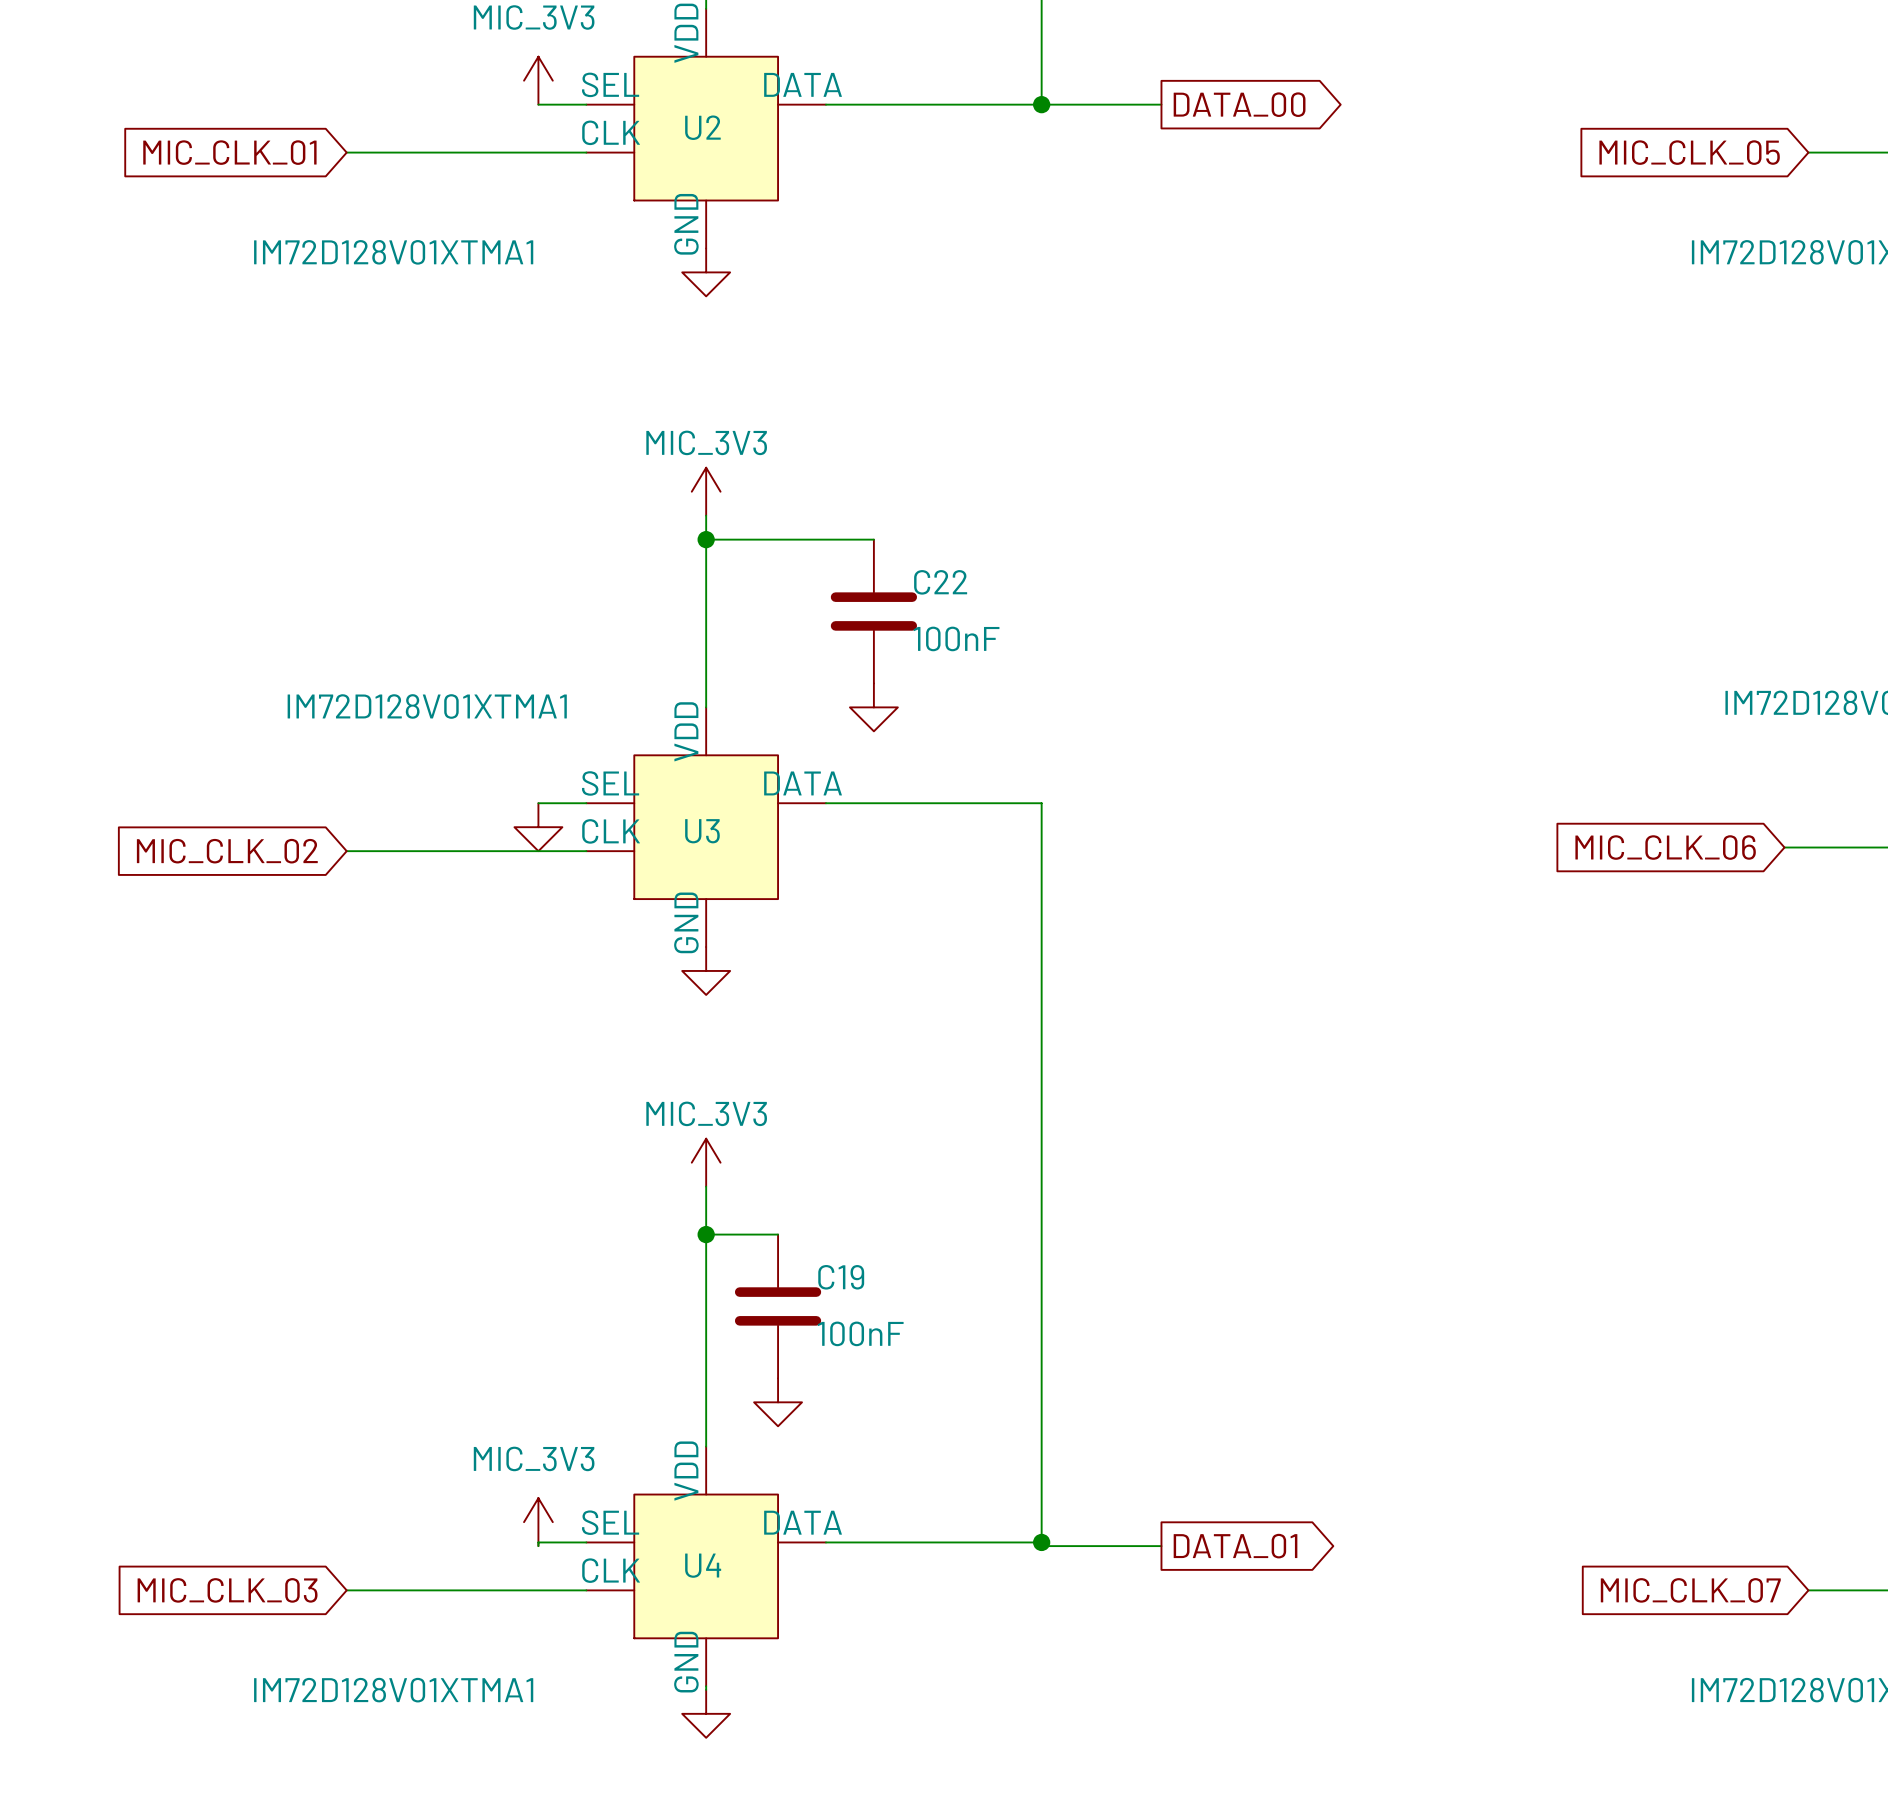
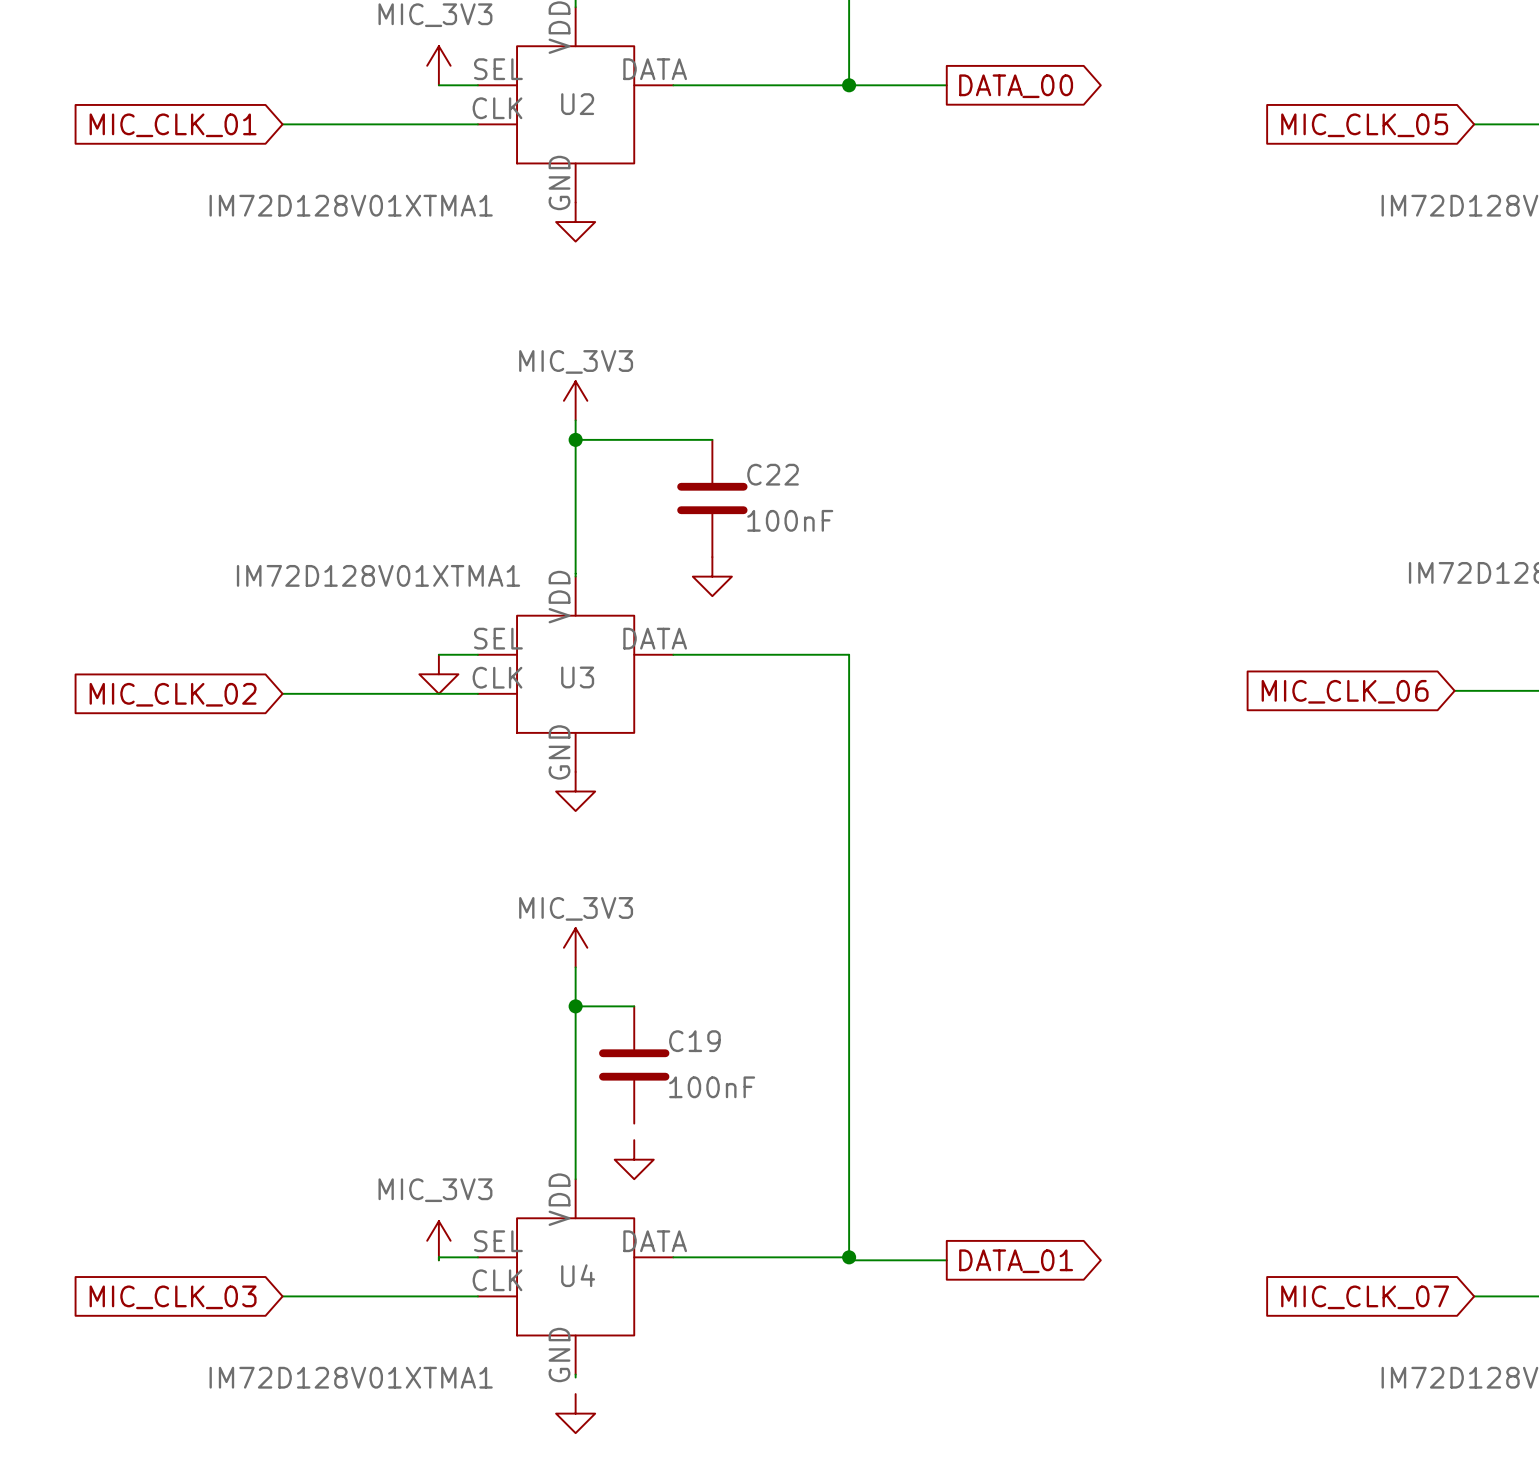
power symbol position: (778, 1402) -> (634, 1159)
power symbol position: (706, 1713) -> (575, 1413)

